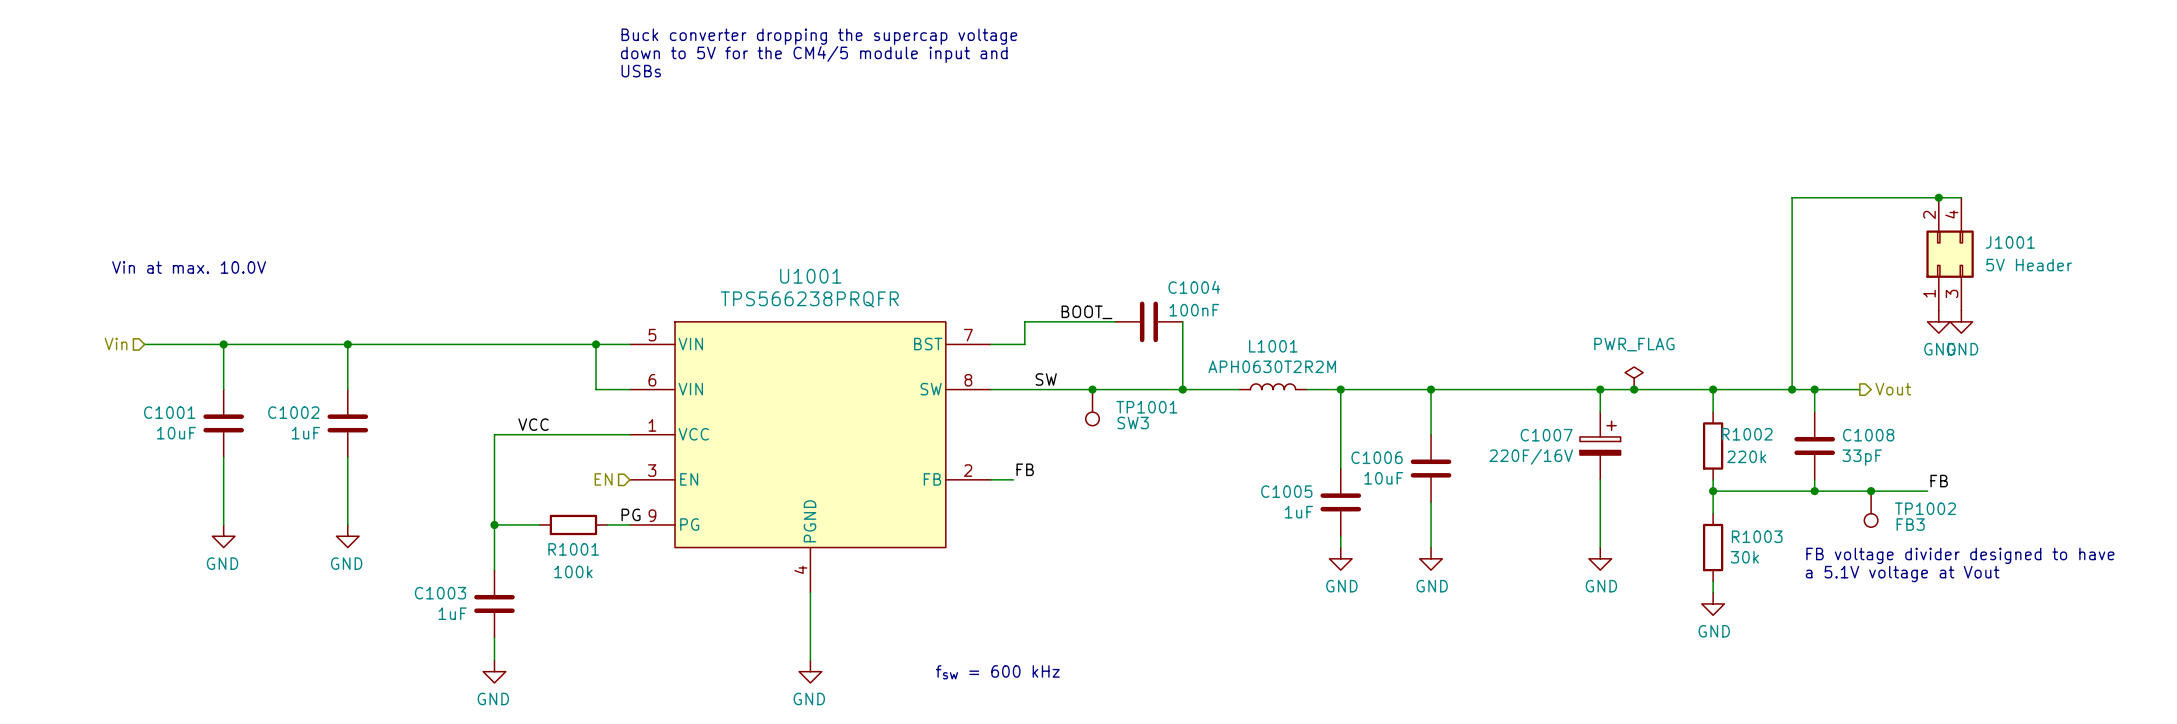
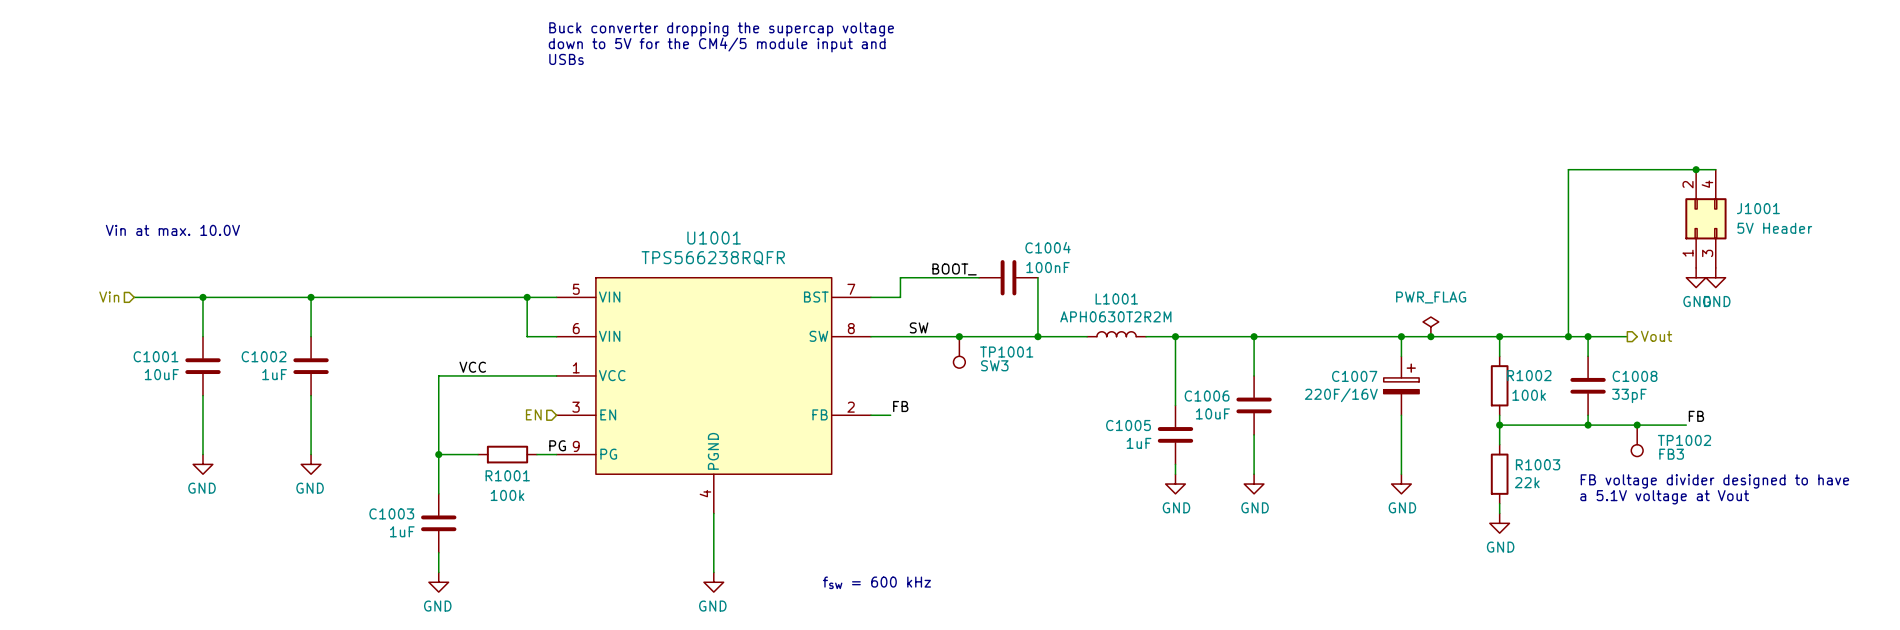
U1001 value: TPS566238PRQFR (809, 299) -> TPS566238RQFR (713, 258)
R1002 value: 220k (1746, 456) -> 100k (1529, 395)
R1003 value: 30k (1744, 557) -> 22k (1527, 482)

